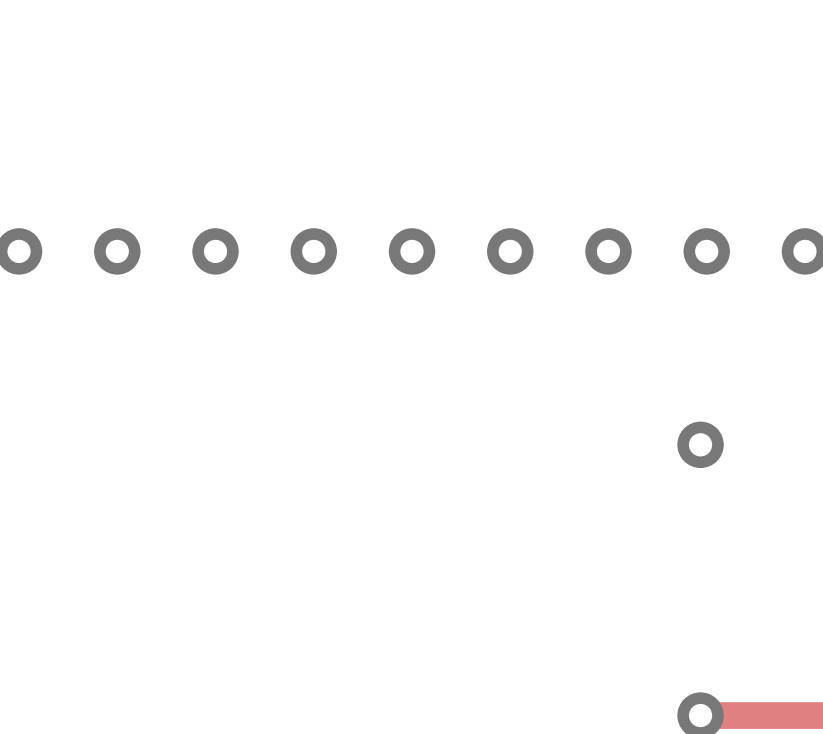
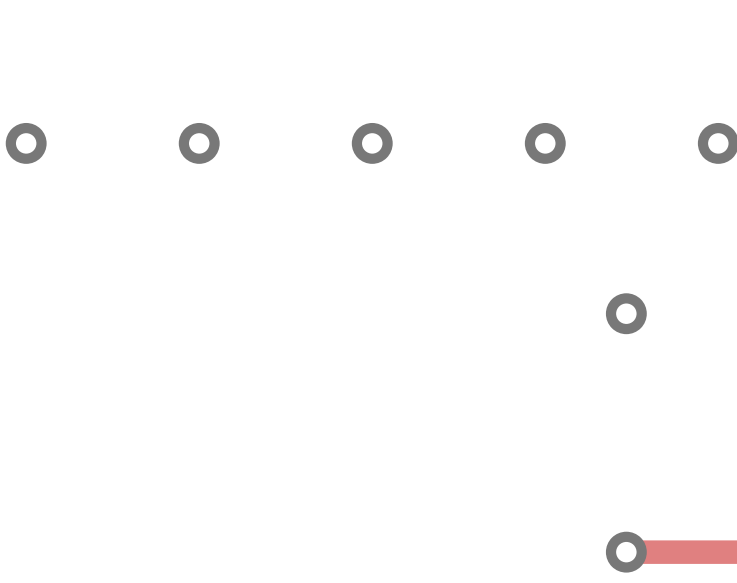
via: (117, 251) -> none
via: (313, 251) -> none
via: (510, 251) -> none
via: (706, 251) -> none

